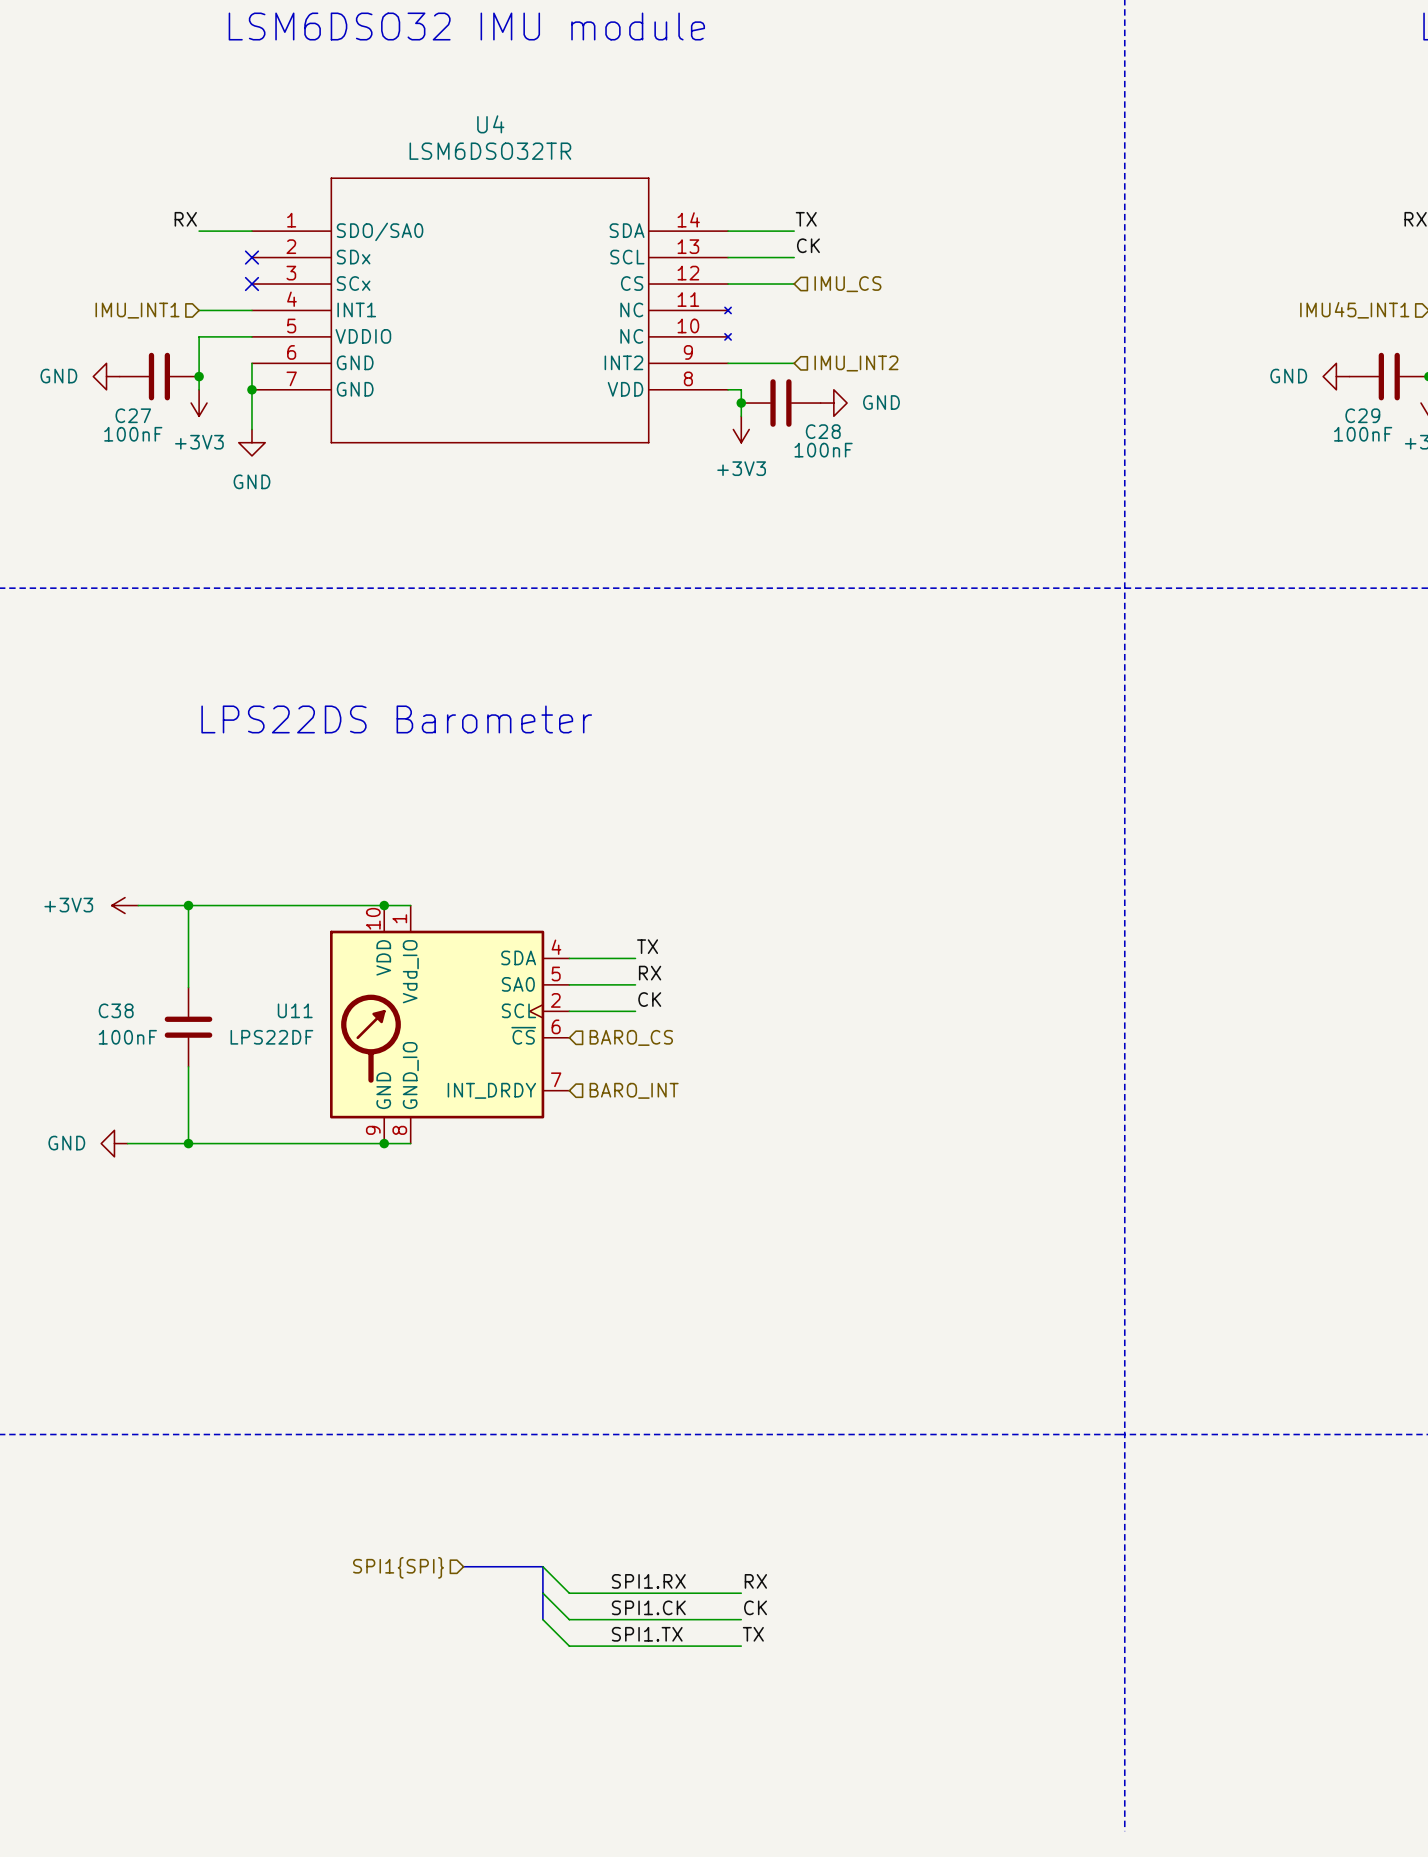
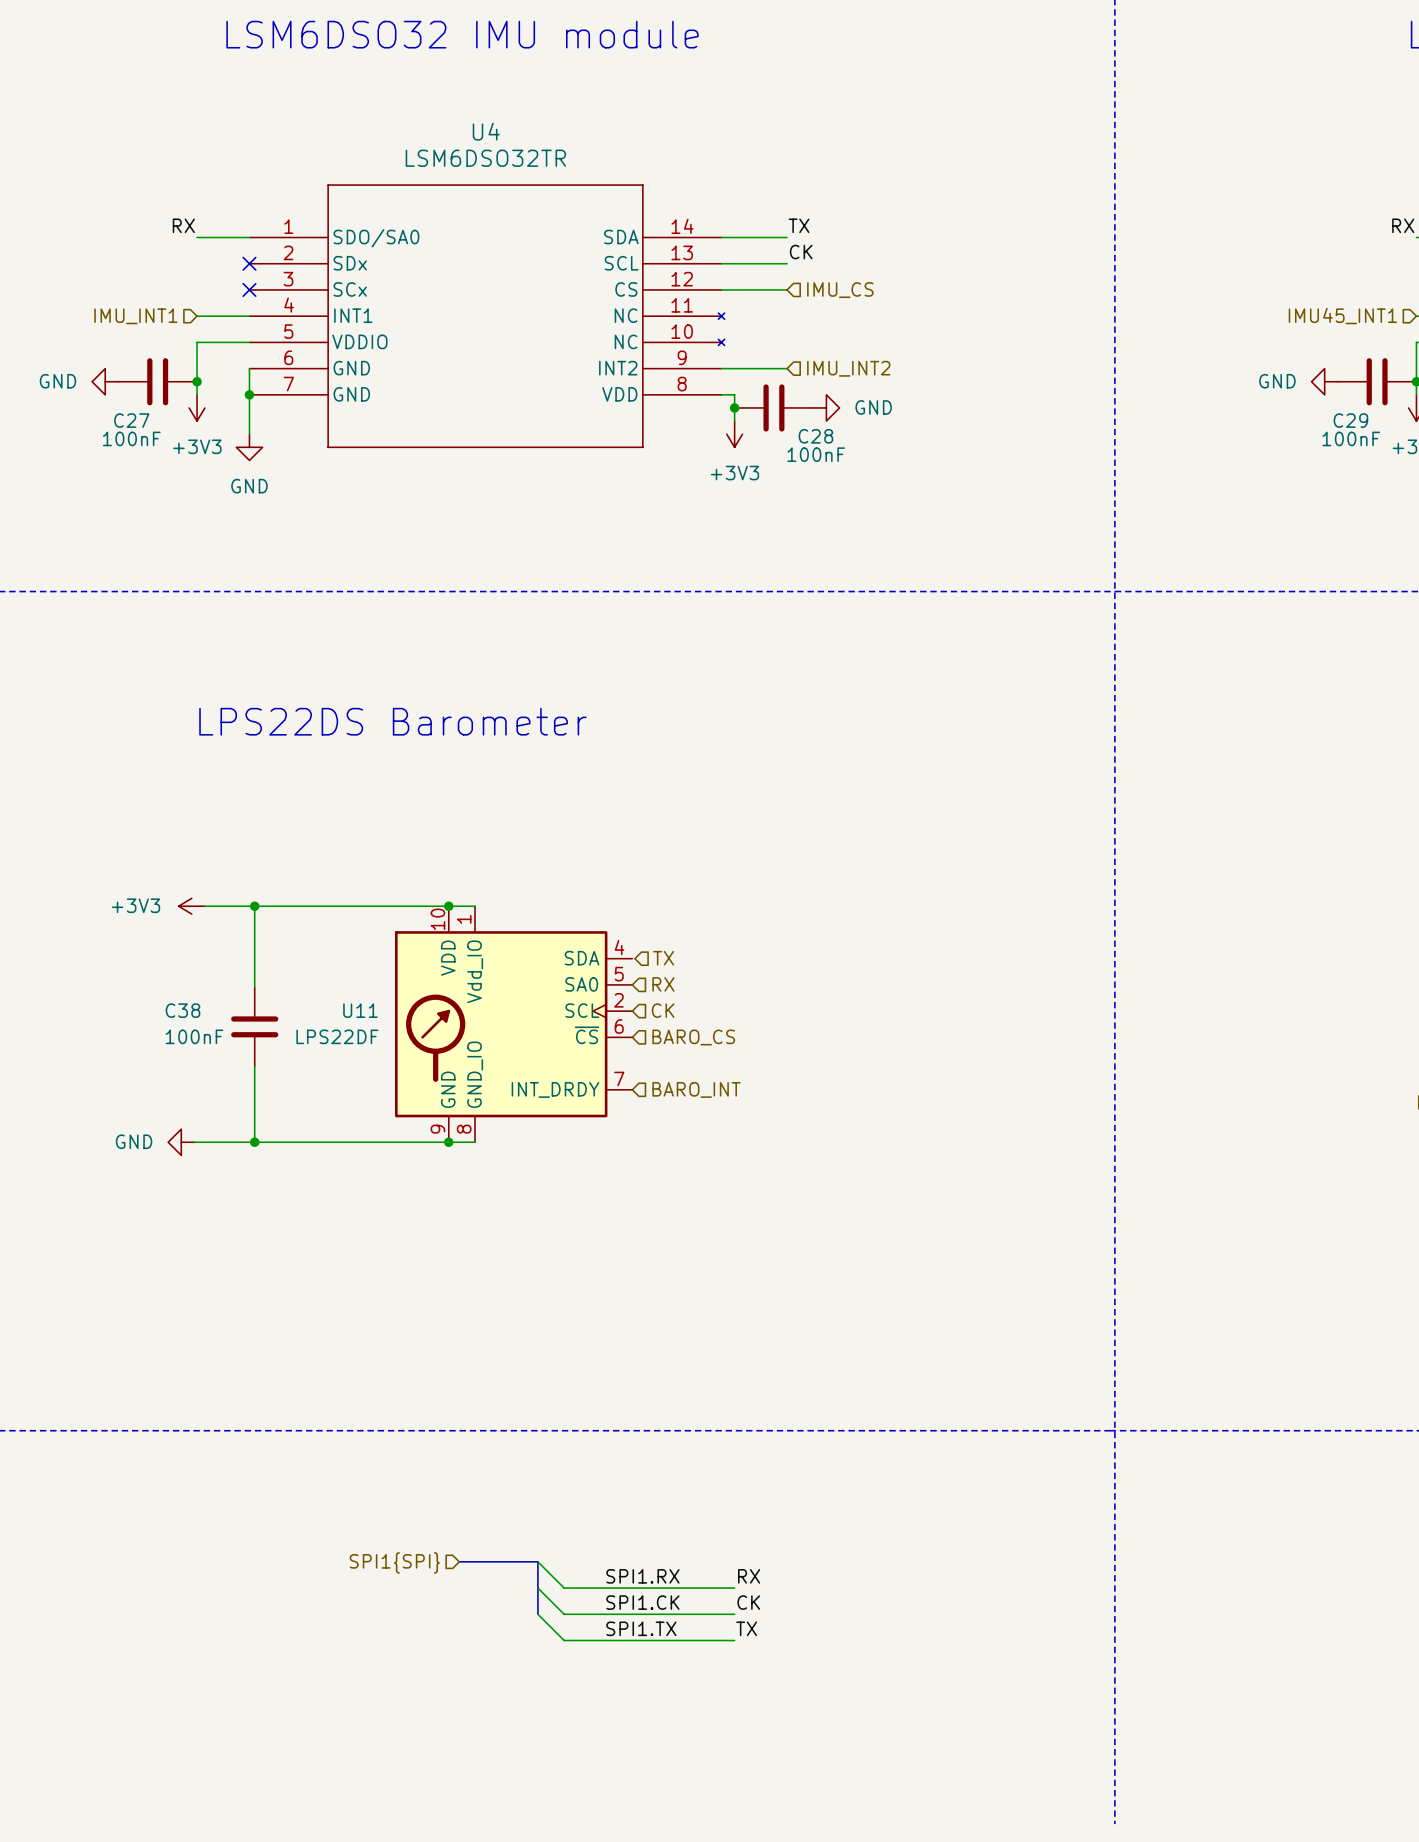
power symbol position: +3V3 (125, 905) -> +3V3 (191, 906)
wire: (138, 905) (207, 905) -> none
wire: (188, 905) (188, 987) -> (254, 906) (254, 987)
junction: (188, 905) -> none
junction: none -> (254, 906)
junction: (384, 905) -> none
wire: none -> (406, 906) (475, 906)
junction: none -> (448, 906)
label: TX (647, 946) -> none
hierarchical label: none -> TX (663, 958)
label: RX (650, 973) -> none
hierarchical label: none -> RX (663, 984)
label: CK (649, 999) -> none
hierarchical label: none -> CK (663, 1010)
U11 position: (449, 1024) -> (513, 1024)
C38 position: (188, 1027) -> (254, 1026)
hierarchical label position: BARO_CS (631, 1037) -> BARO_CS (693, 1037)
wire: (188, 1066) (188, 1143) -> (254, 1066) (254, 1142)
hierarchical label position: BARO_INT (634, 1090) -> BARO_INT (696, 1089)
power symbol position: GND (114, 1143) -> GND (181, 1142)
wire: (127, 1143) (196, 1143) -> none
junction: (188, 1143) -> none
junction: none -> (254, 1142)
junction: (384, 1143) -> none
wire: none -> (406, 1142) (475, 1142)
junction: none -> (448, 1142)

